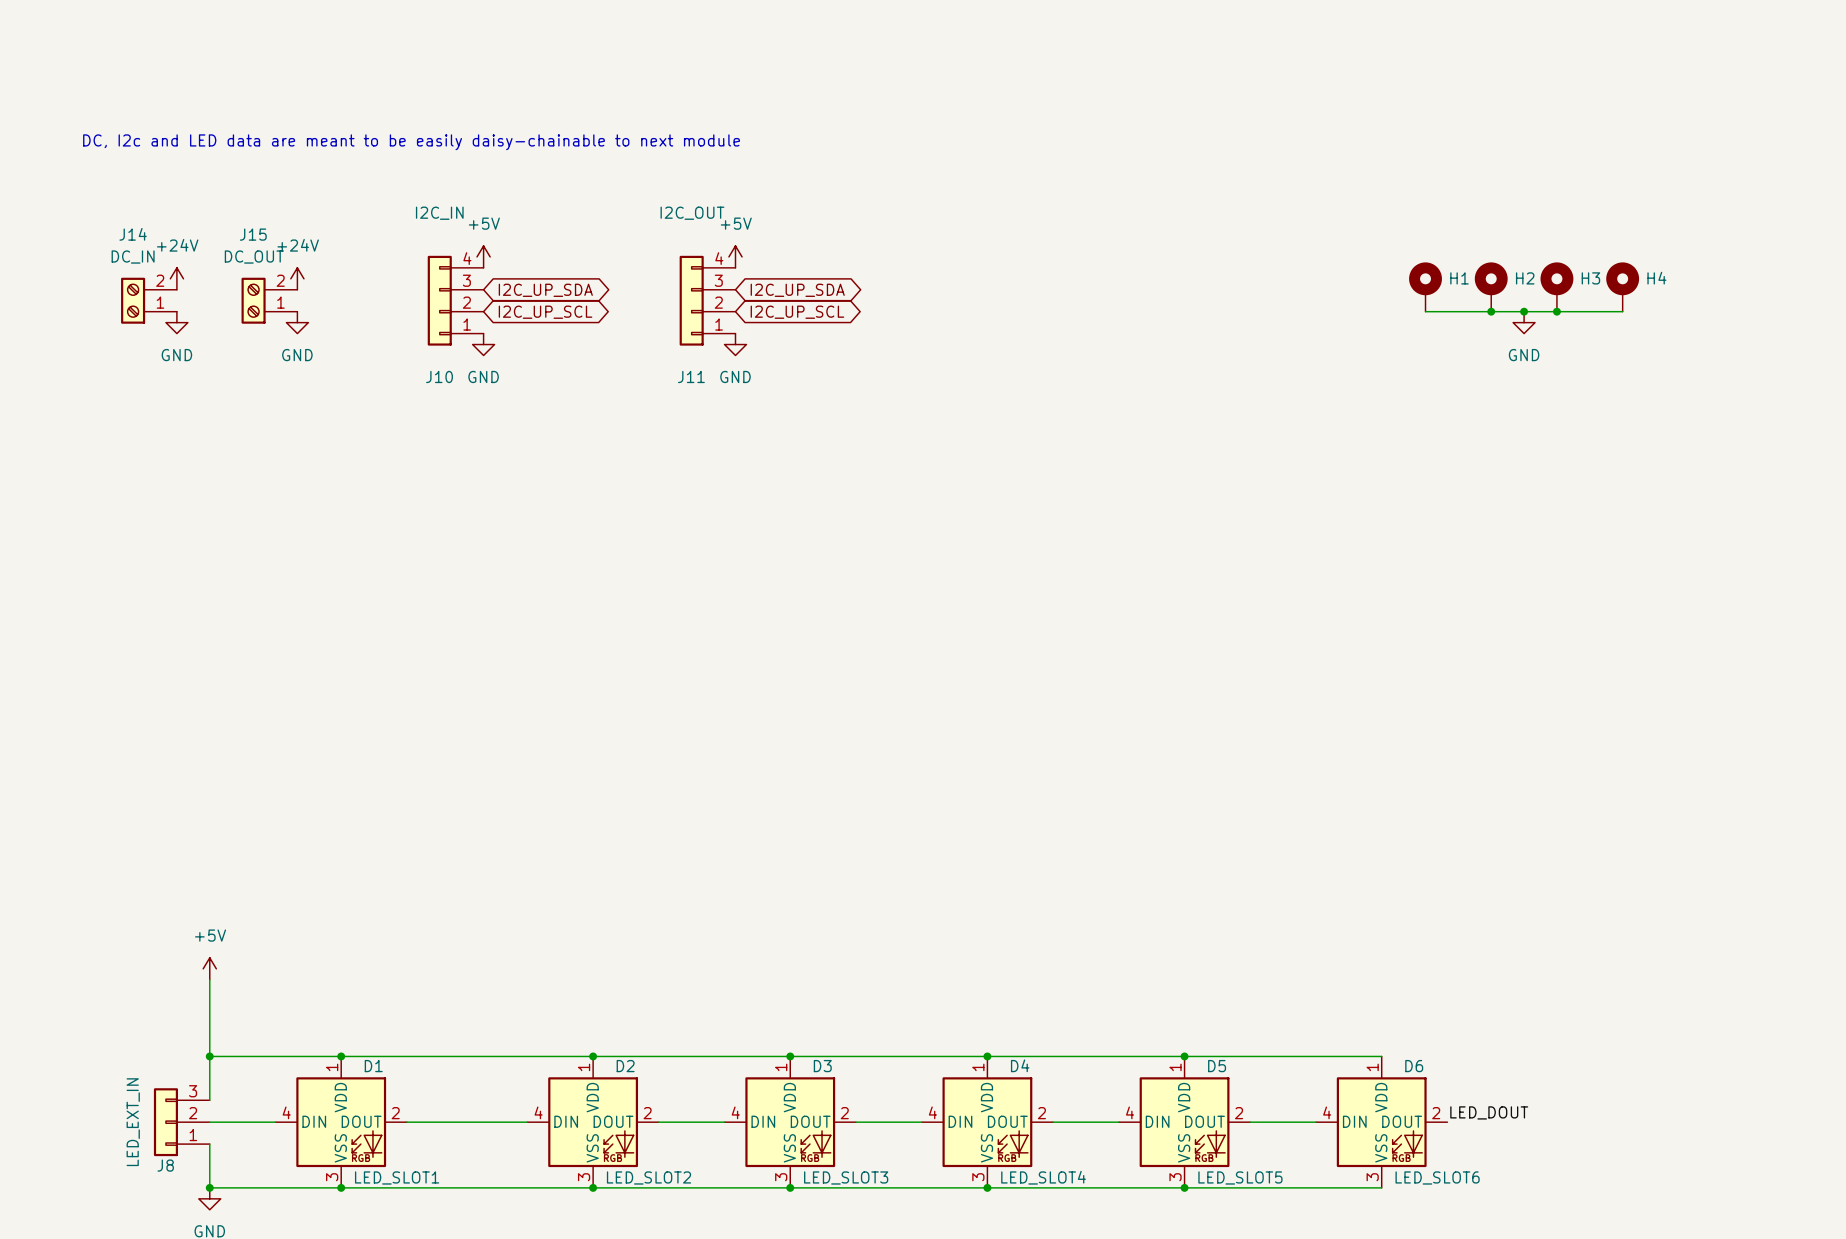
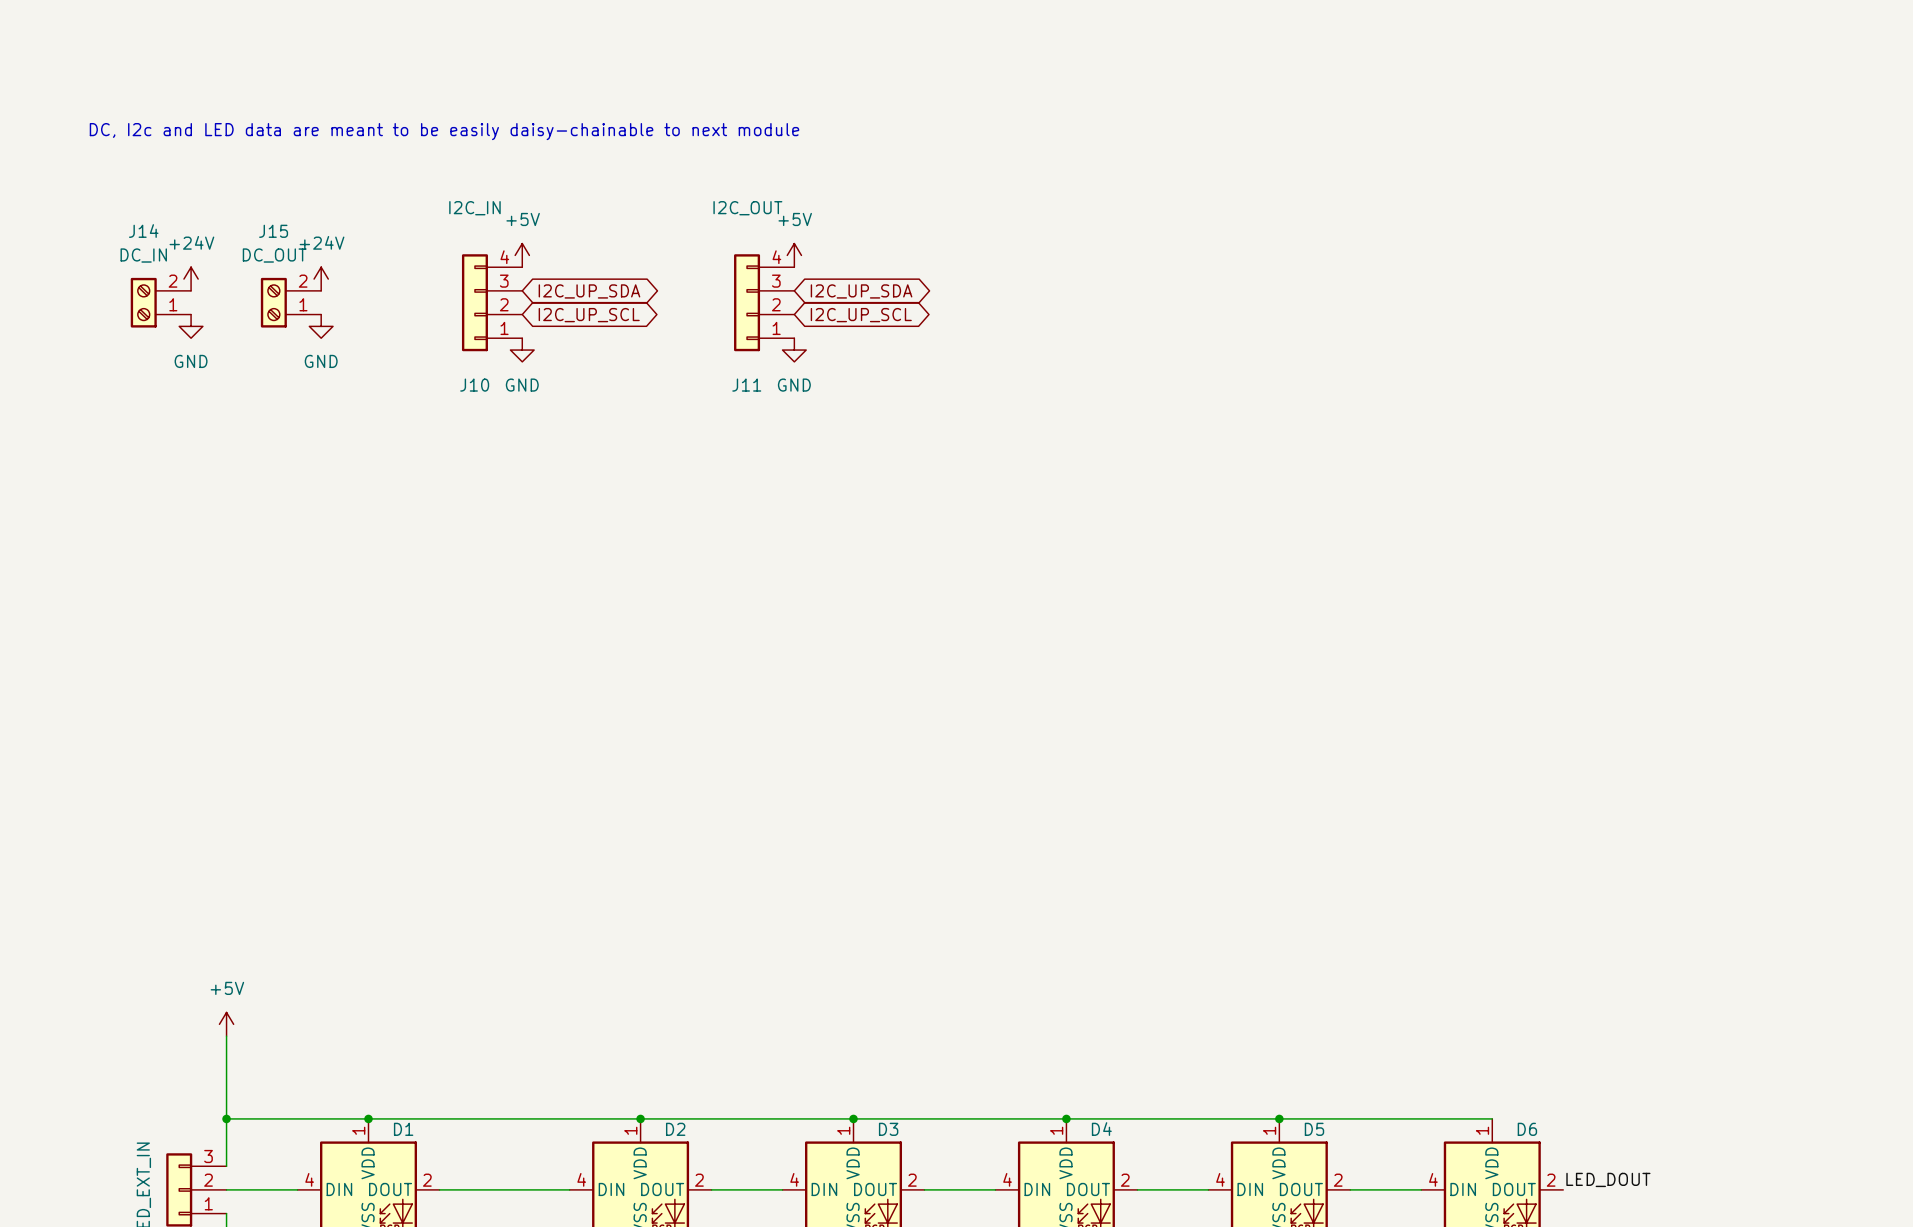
H1: (1425, 287) -> none
H2: (1491, 287) -> none
H3: (1556, 287) -> none
H4: (1622, 287) -> none
wire: (1425, 311) (1622, 311) -> none
junction: (1491, 311) -> none
junction: (1524, 311) -> none
junction: (1556, 311) -> none
power symbol: GND (1524, 322) -> none

